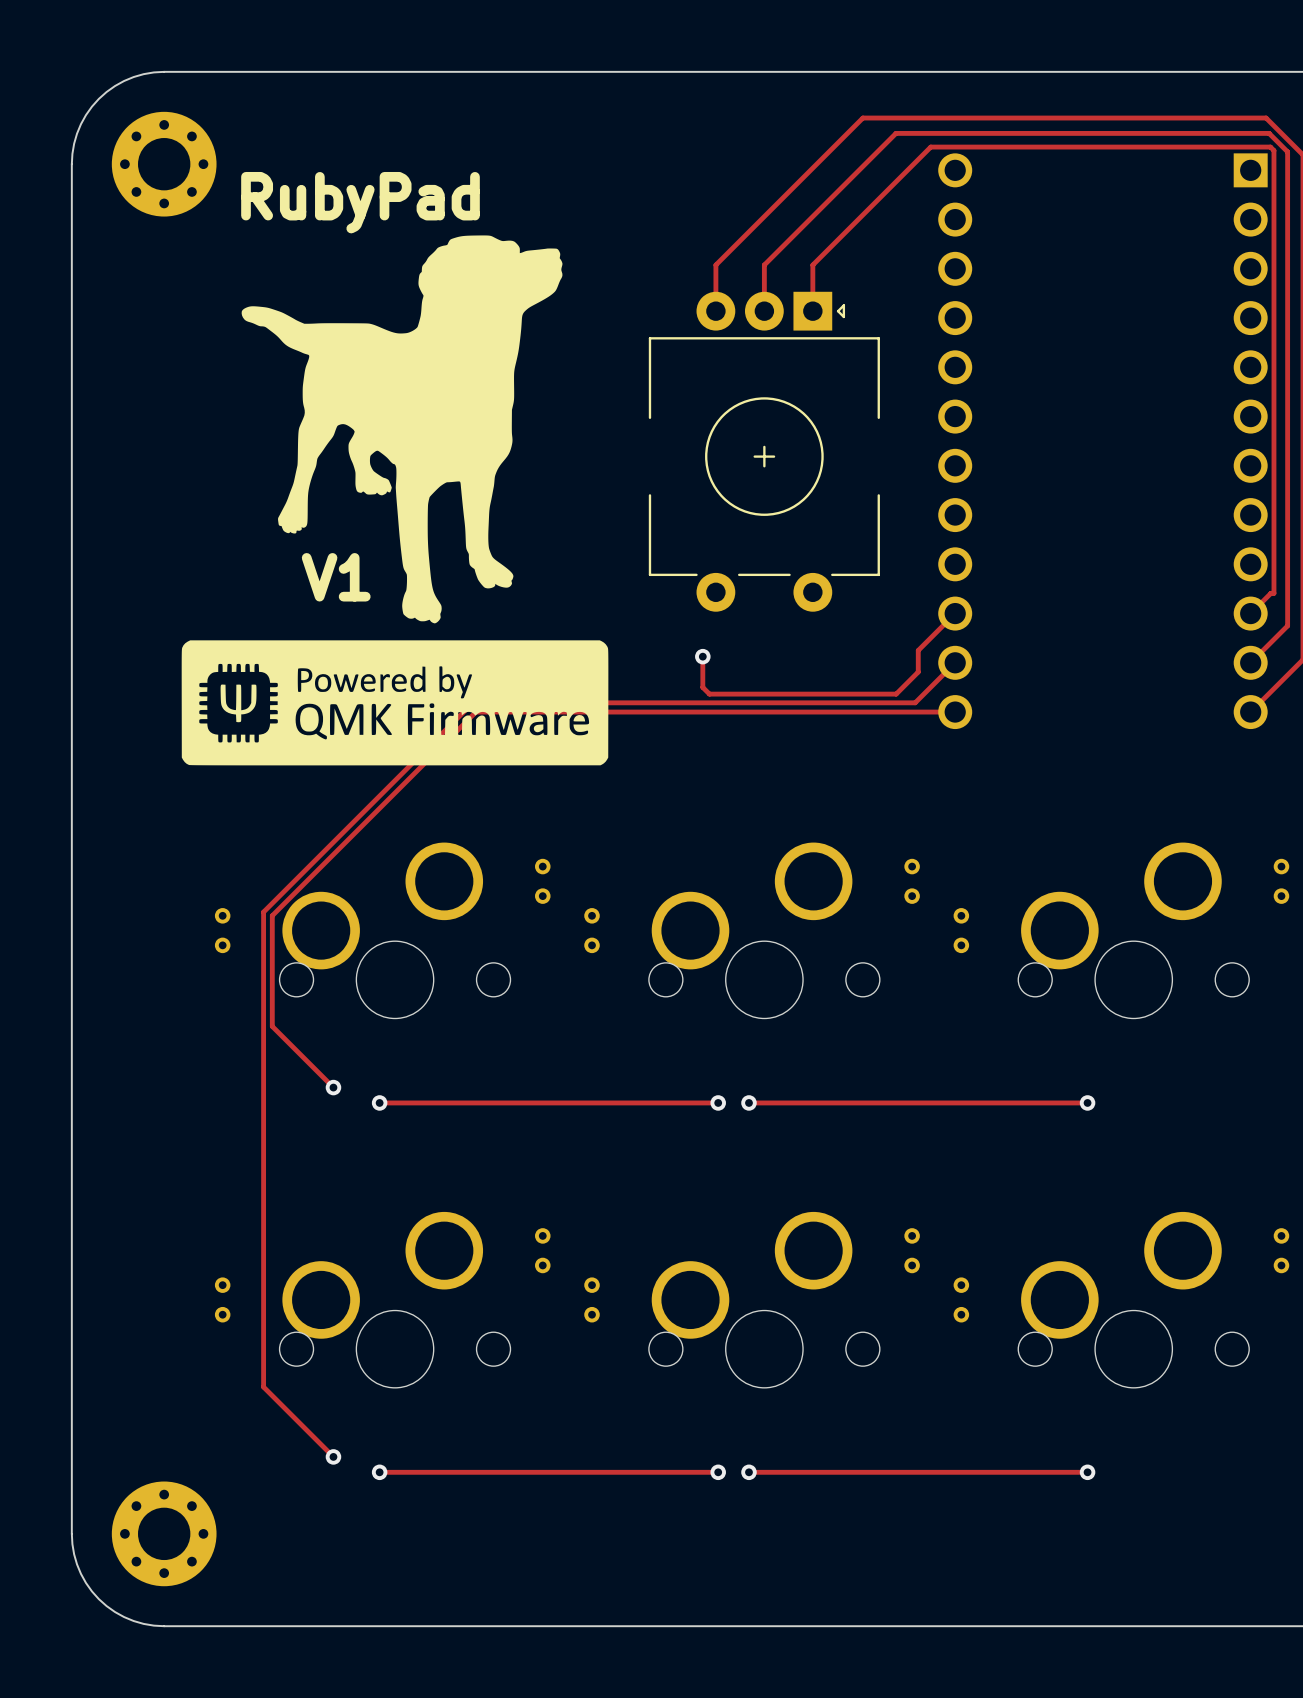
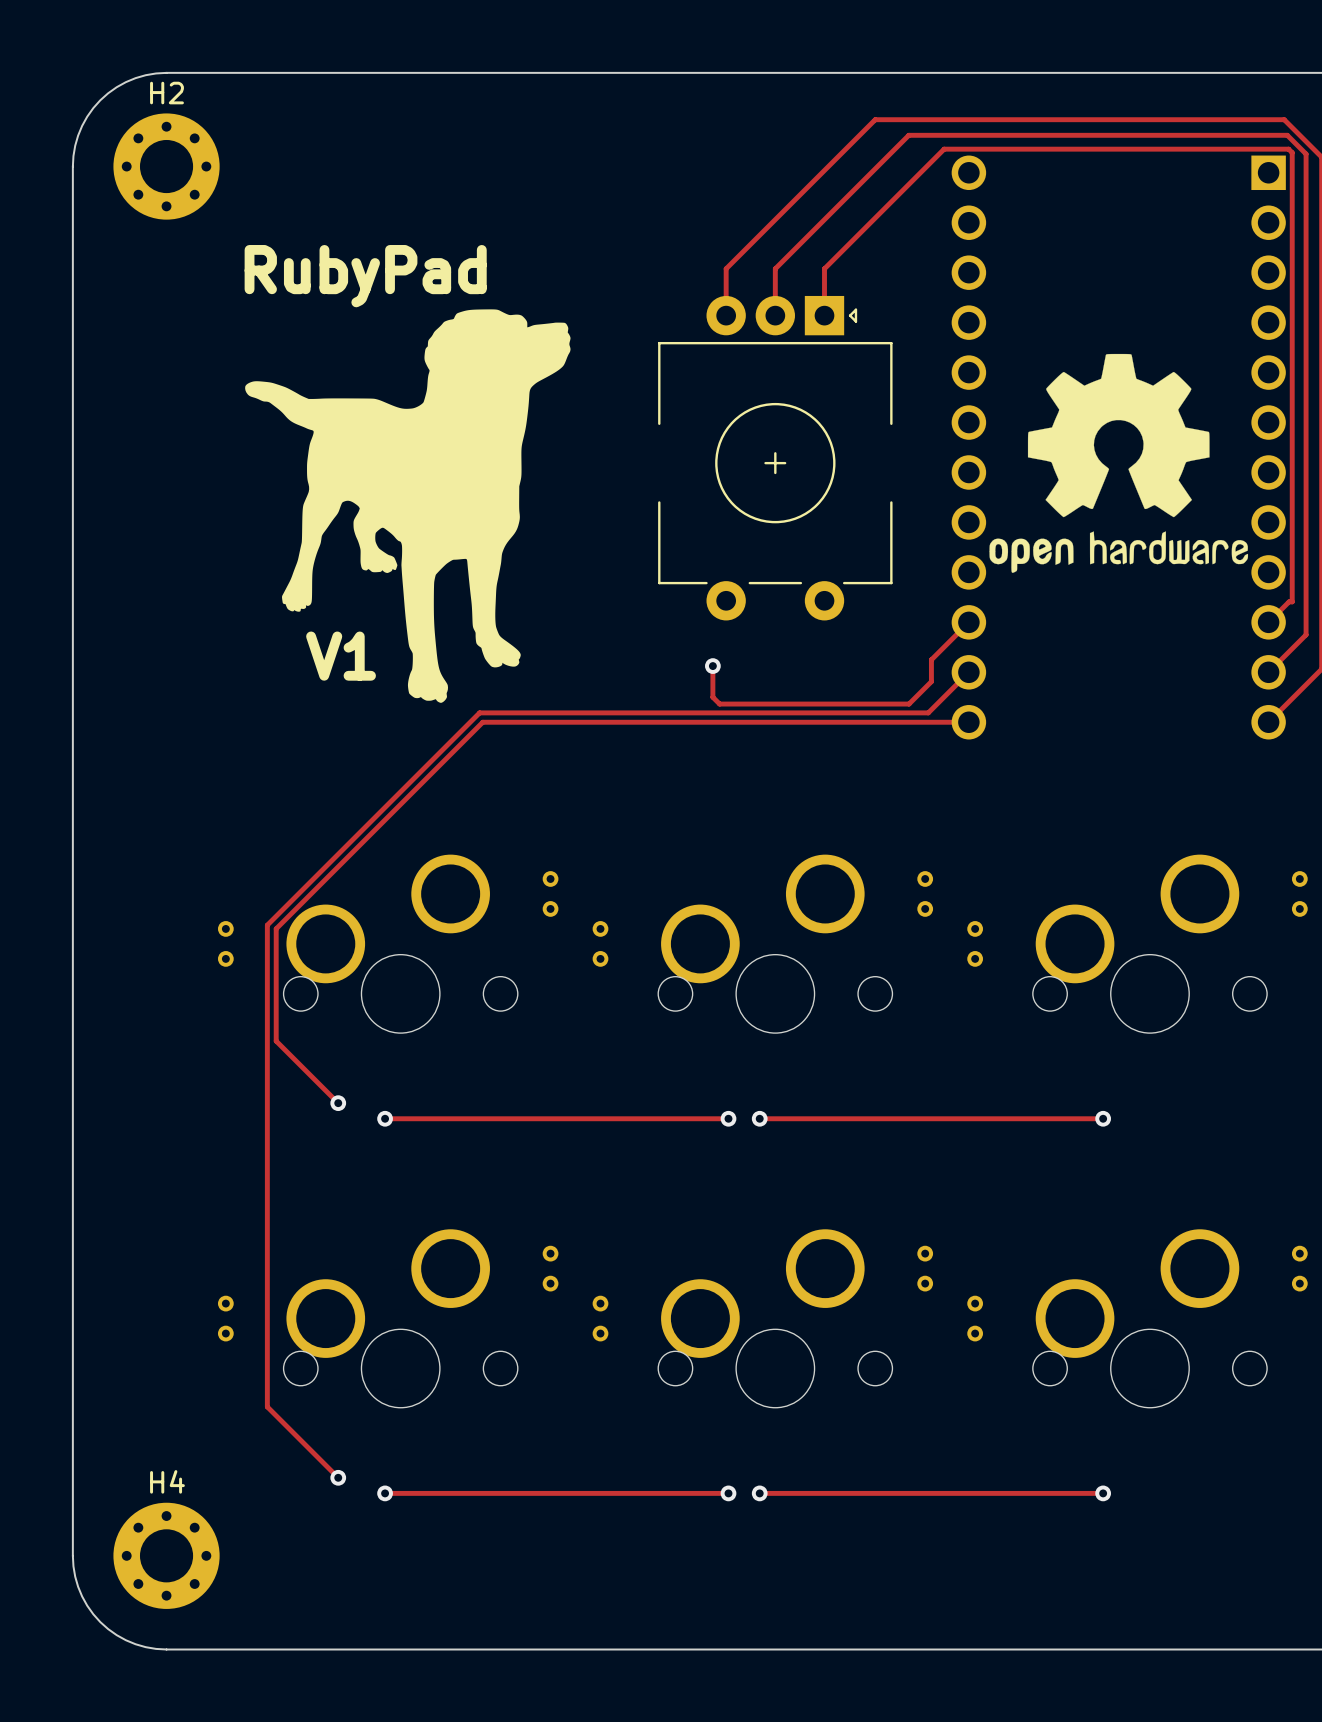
H2 name: none -> H2 (167, 93)
drawing: none -> [989, 353, 1249, 573]
drawing position: (402, 429) -> (407, 506)
drawing: [181, 640, 609, 766] -> none
H4 name: none -> H4 (167, 1481)

